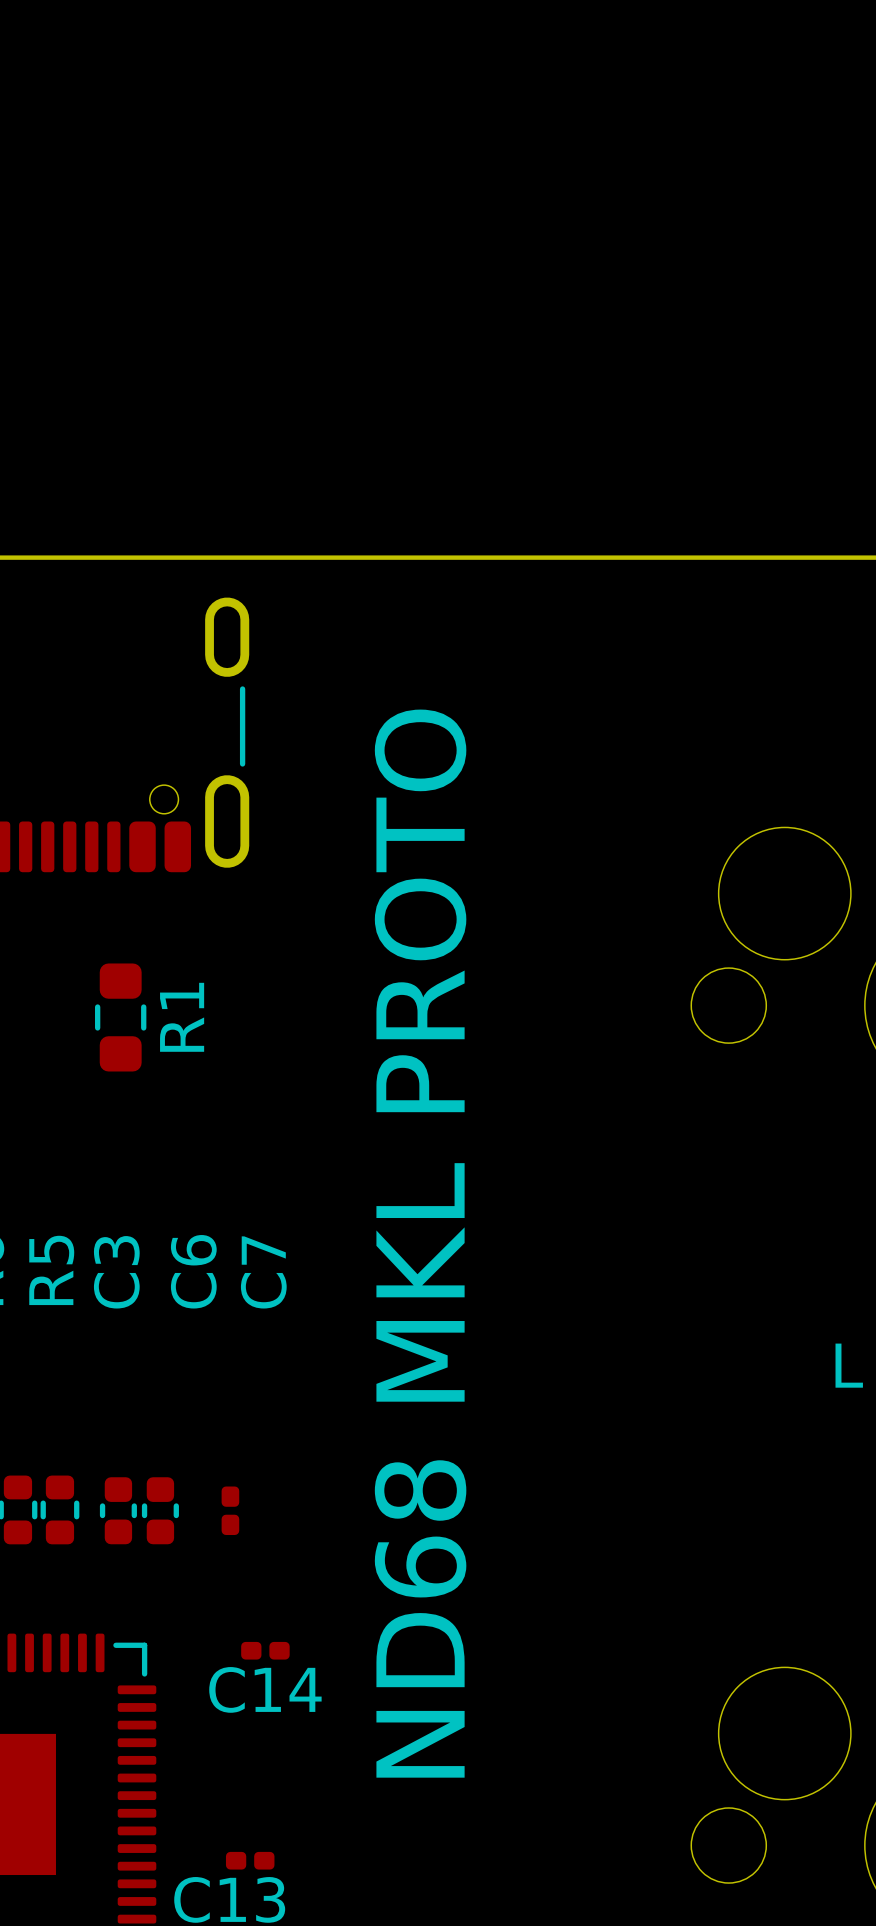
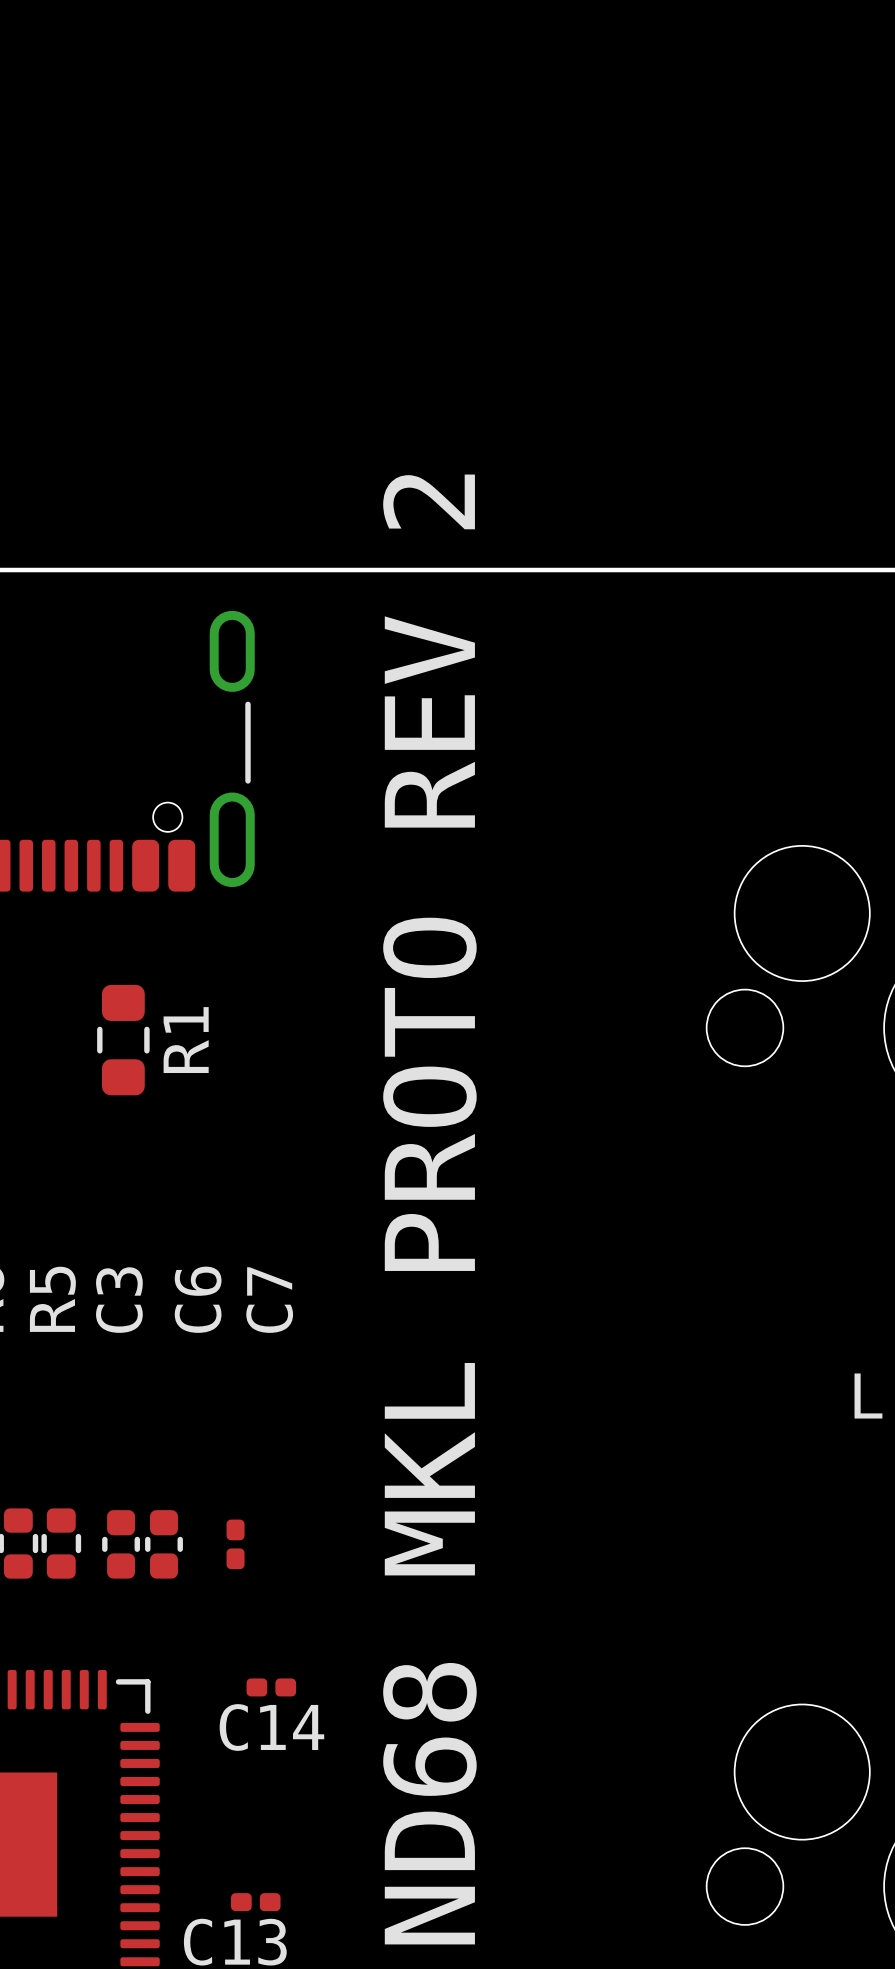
text: ND68 MKL PROTO (420, 1243) -> ND68 MKL PROTO REV 2 (429, 1209)

